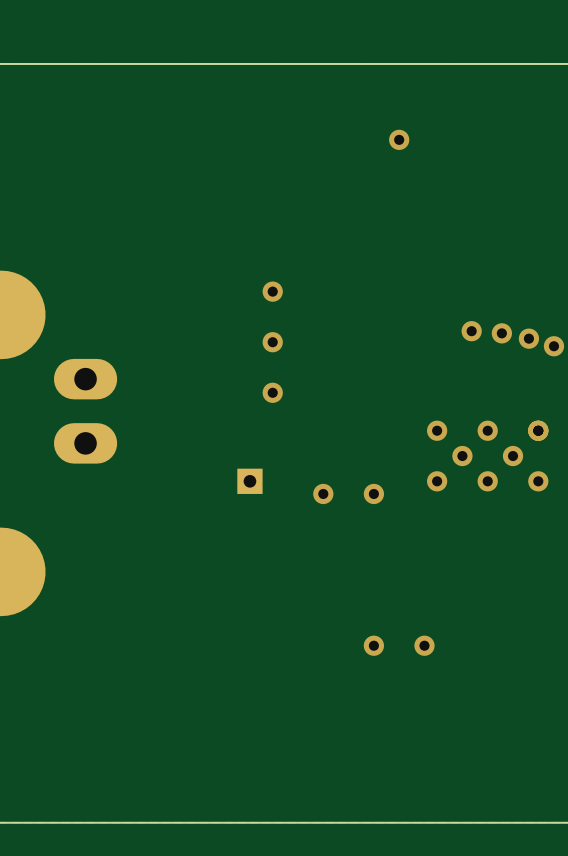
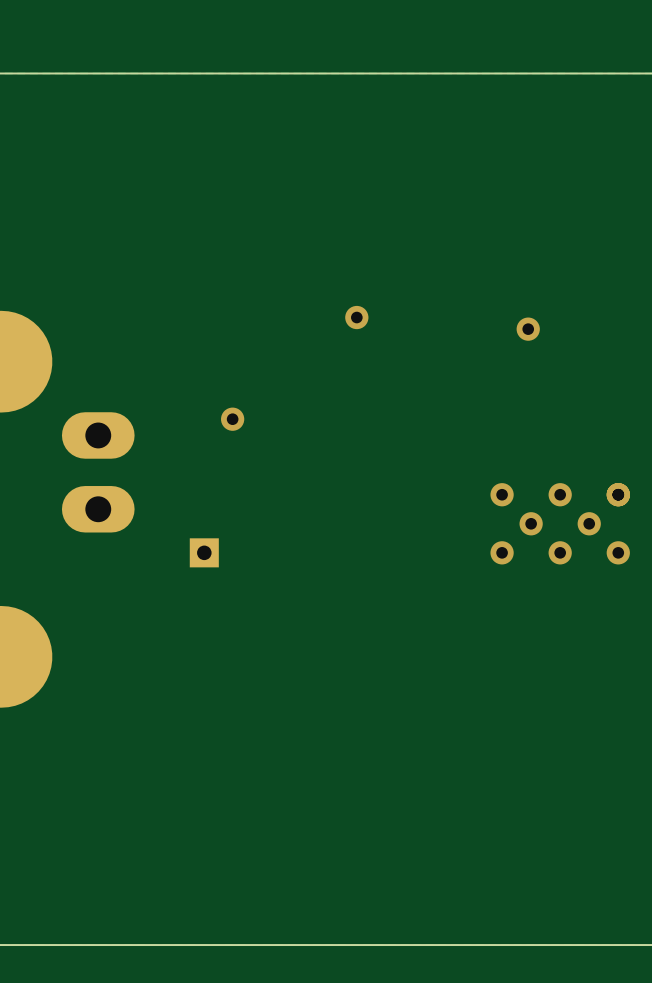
via: (399, 139) -> none
via: none -> (356, 317)
via: none -> (528, 329)
via: (272, 291) -> none
via: (471, 331) -> none
via: (501, 333) -> none
via: (528, 338) -> none
via: (272, 342) -> none
via: (553, 346) -> none
via: none -> (232, 419)
via: (272, 392) -> none
part position: (249, 481) -> (204, 552)
via: (323, 493) -> none
via: (373, 493) -> none
via: (373, 645) -> none
via: (424, 645) -> none

